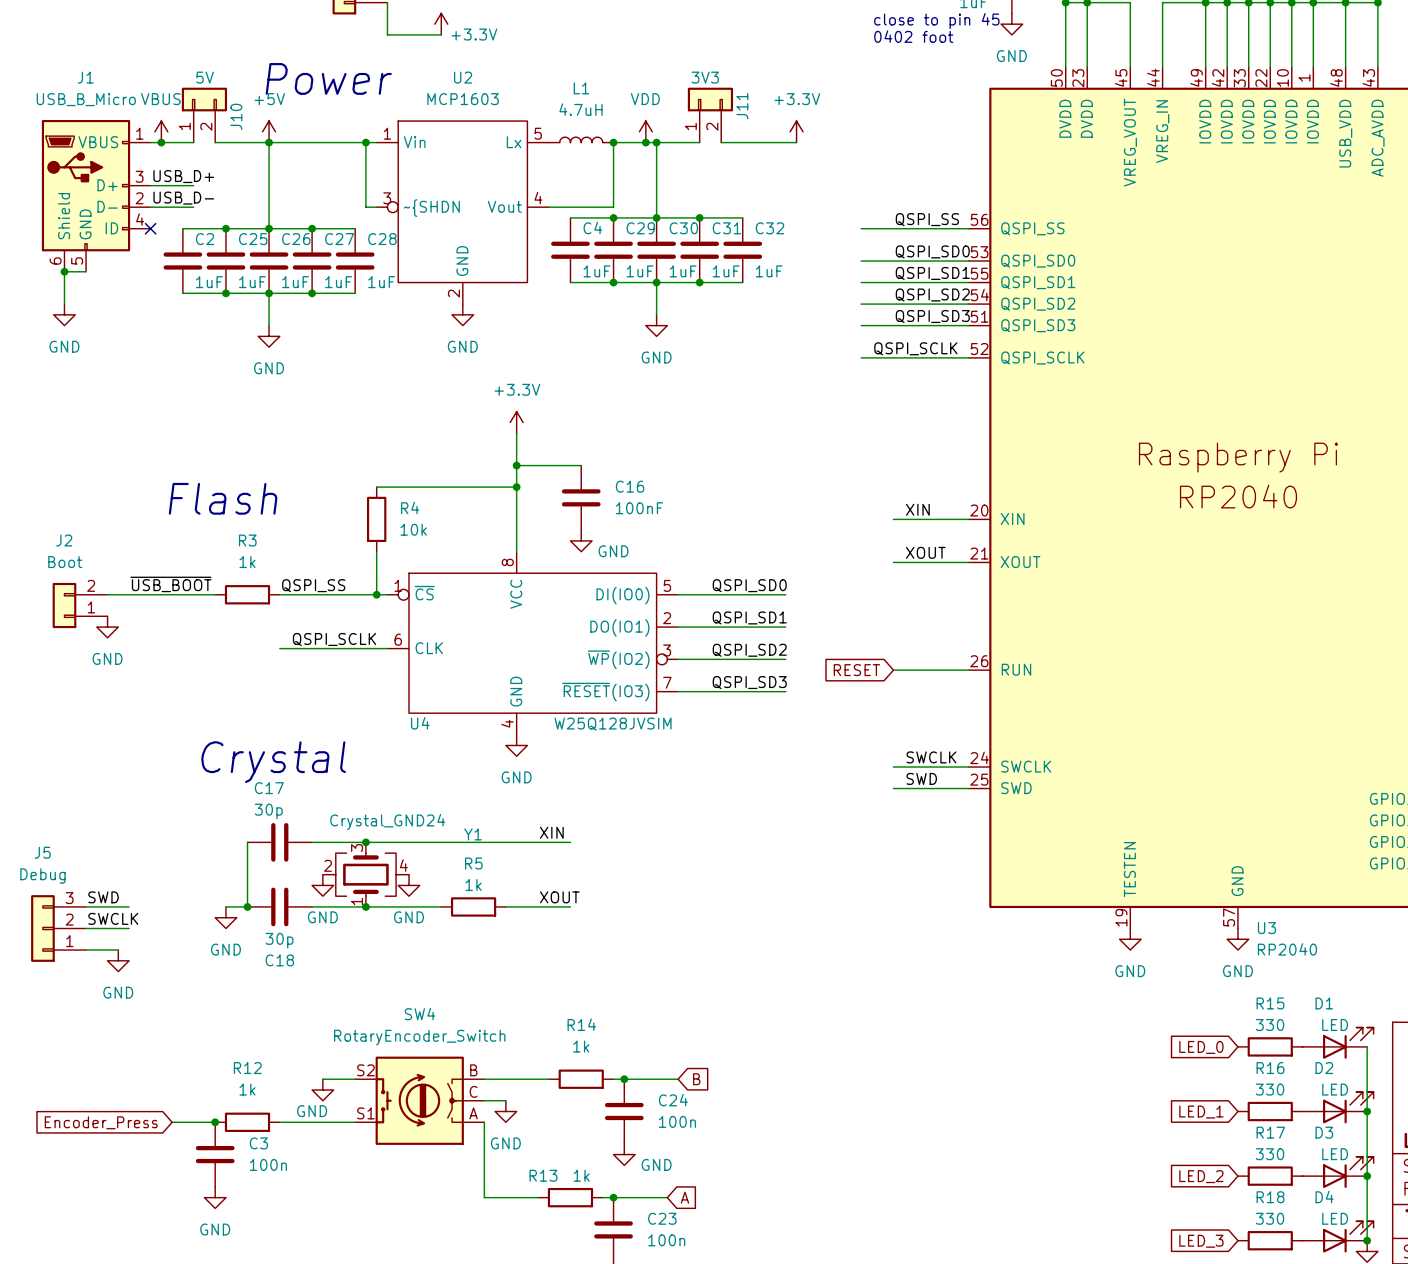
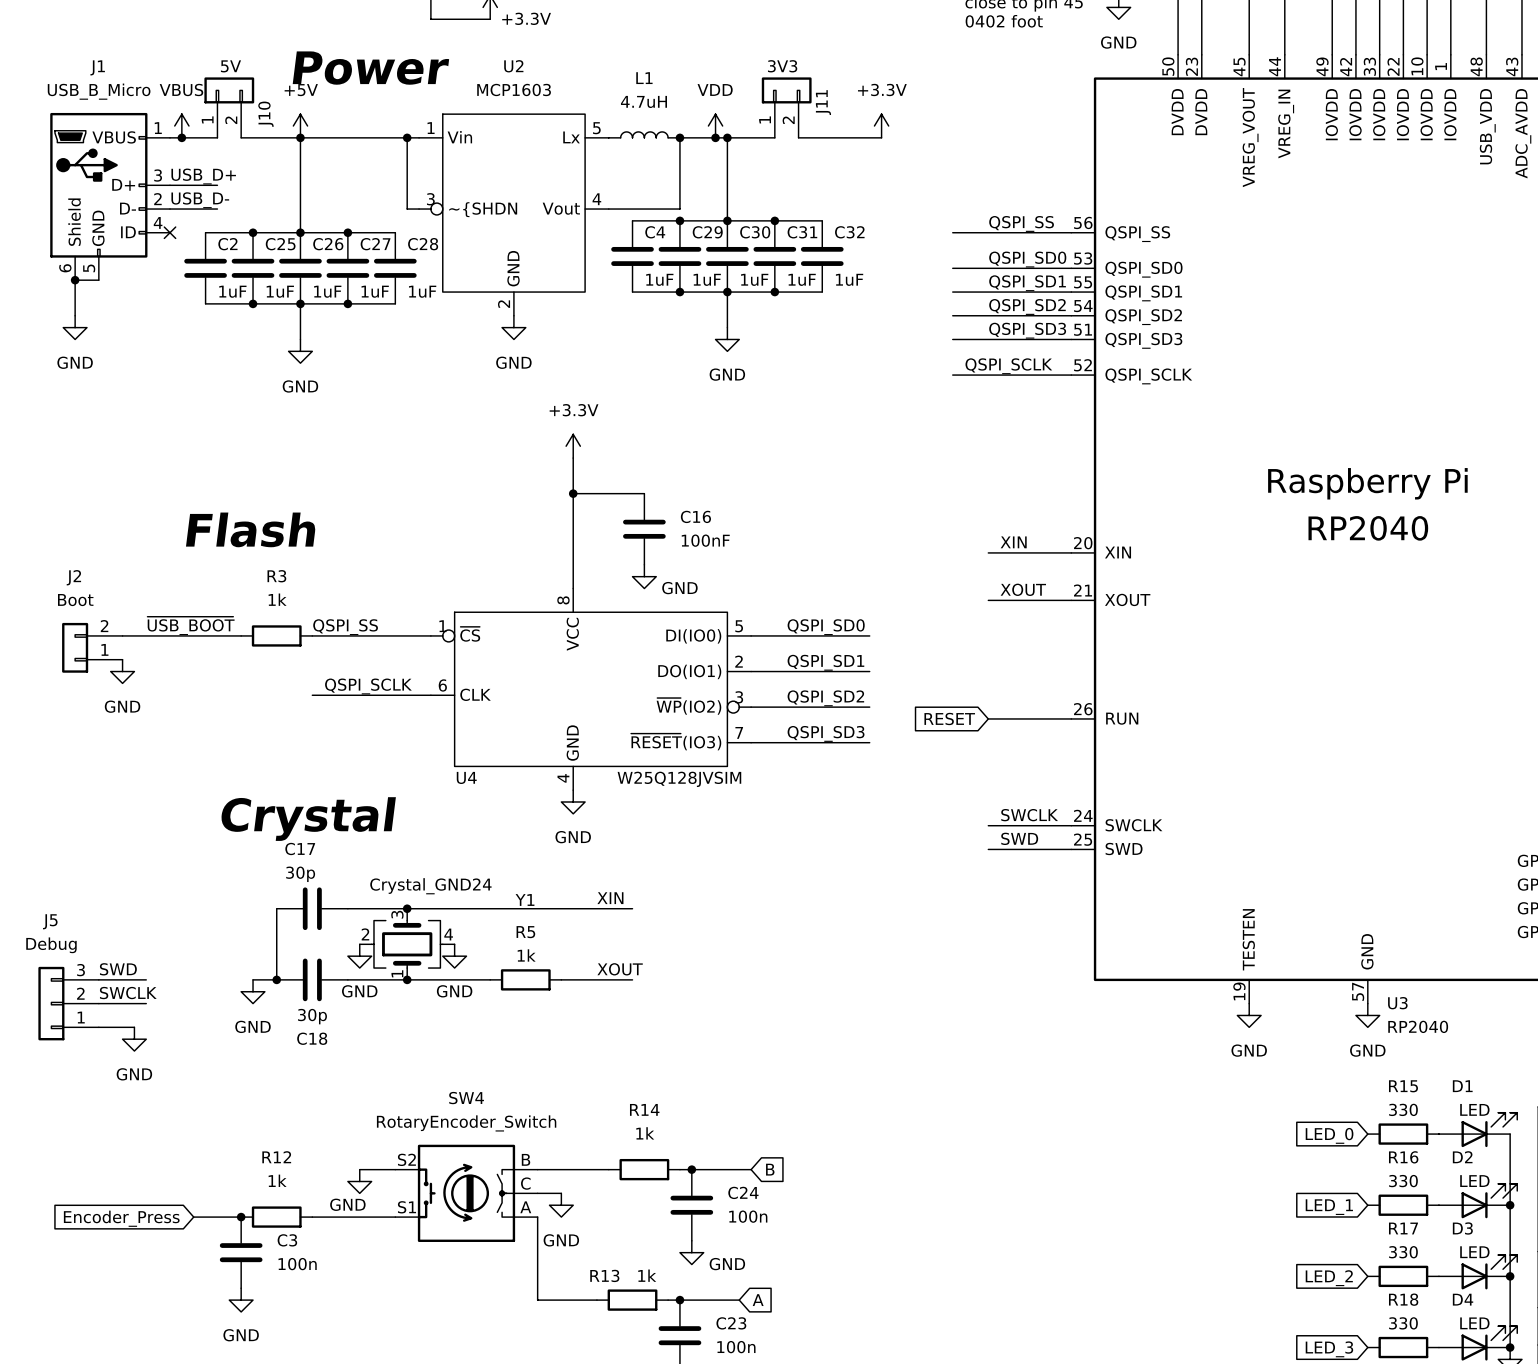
wire: (376, 487) (516, 487) -> none
junction: (516, 487) -> none
R4: 10k (376, 519) -> none
wire: (376, 551) (376, 594) -> none
junction: (376, 594) -> none

